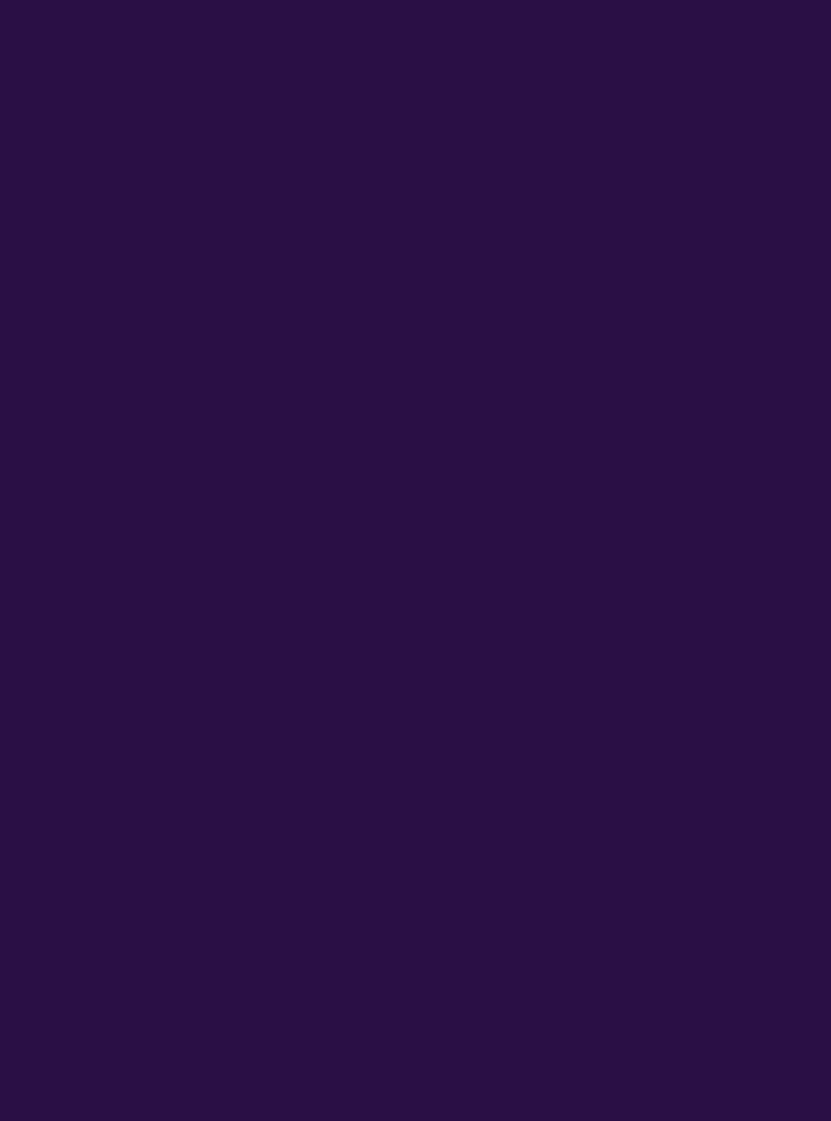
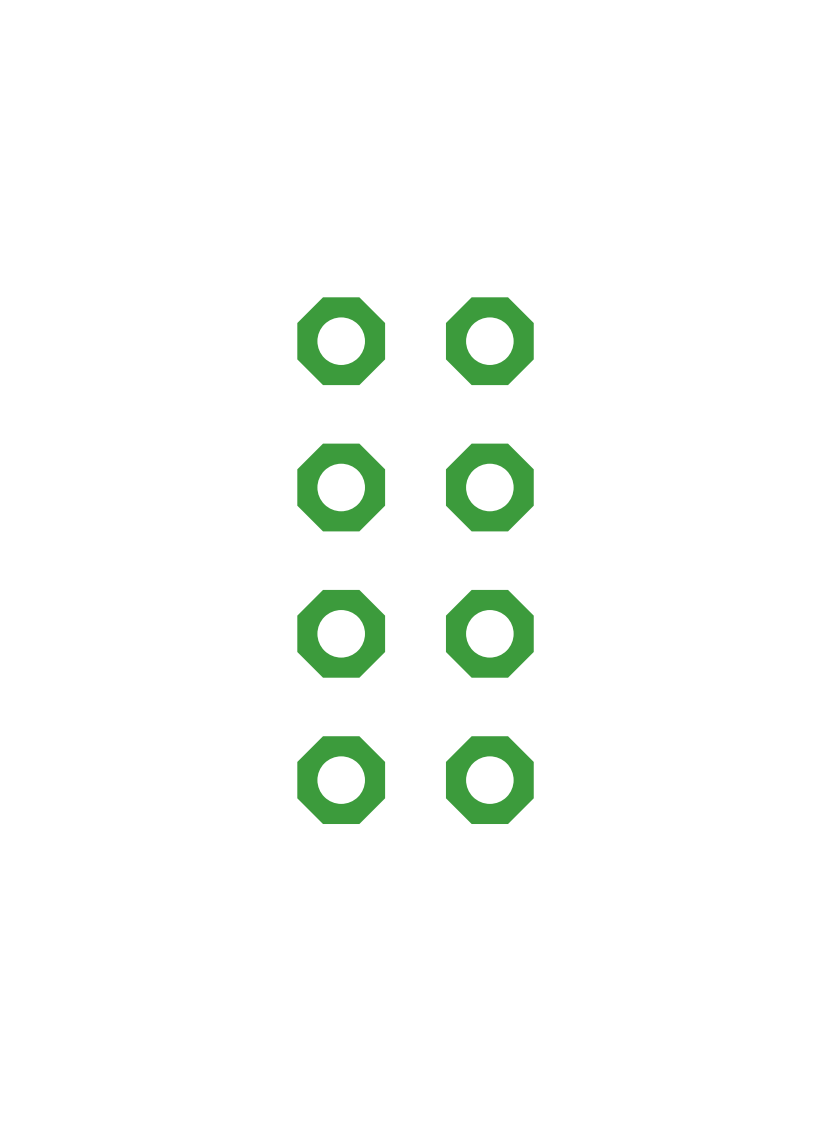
part: none -> (415, 341)
part: none -> (415, 487)
part: none -> (415, 633)
part: none -> (415, 780)

